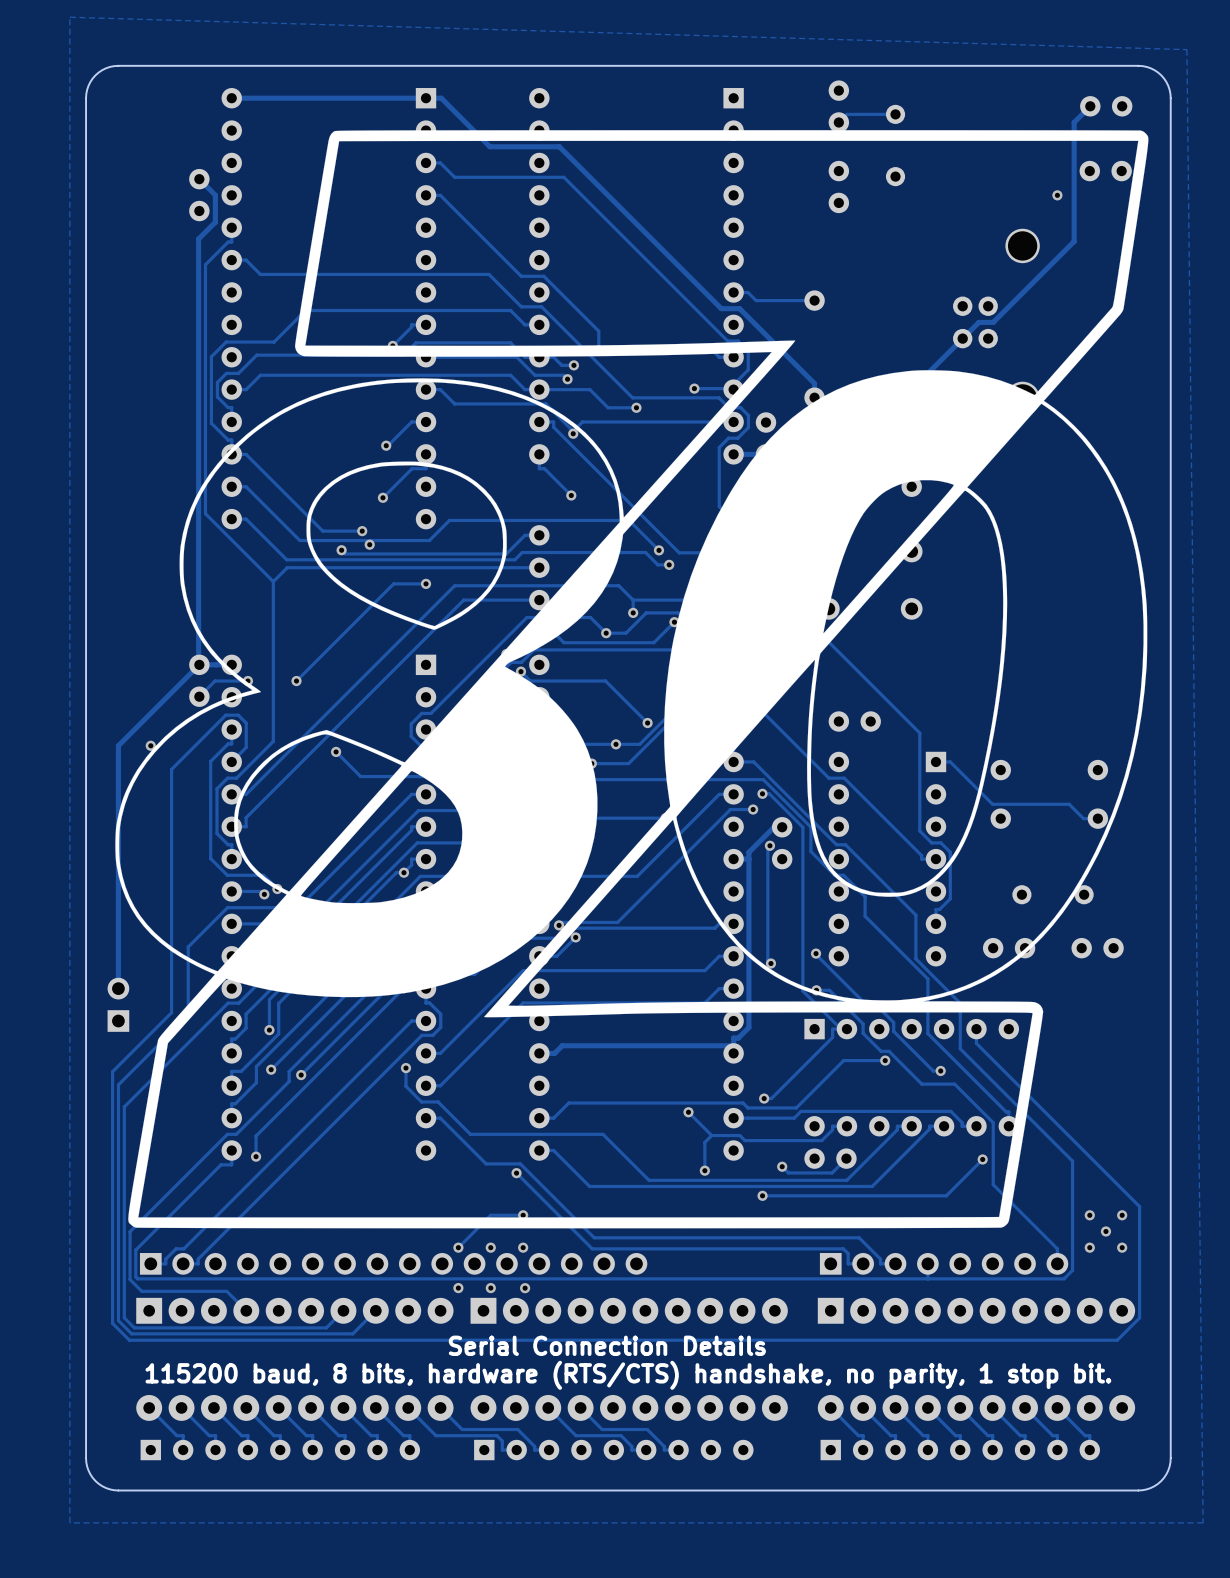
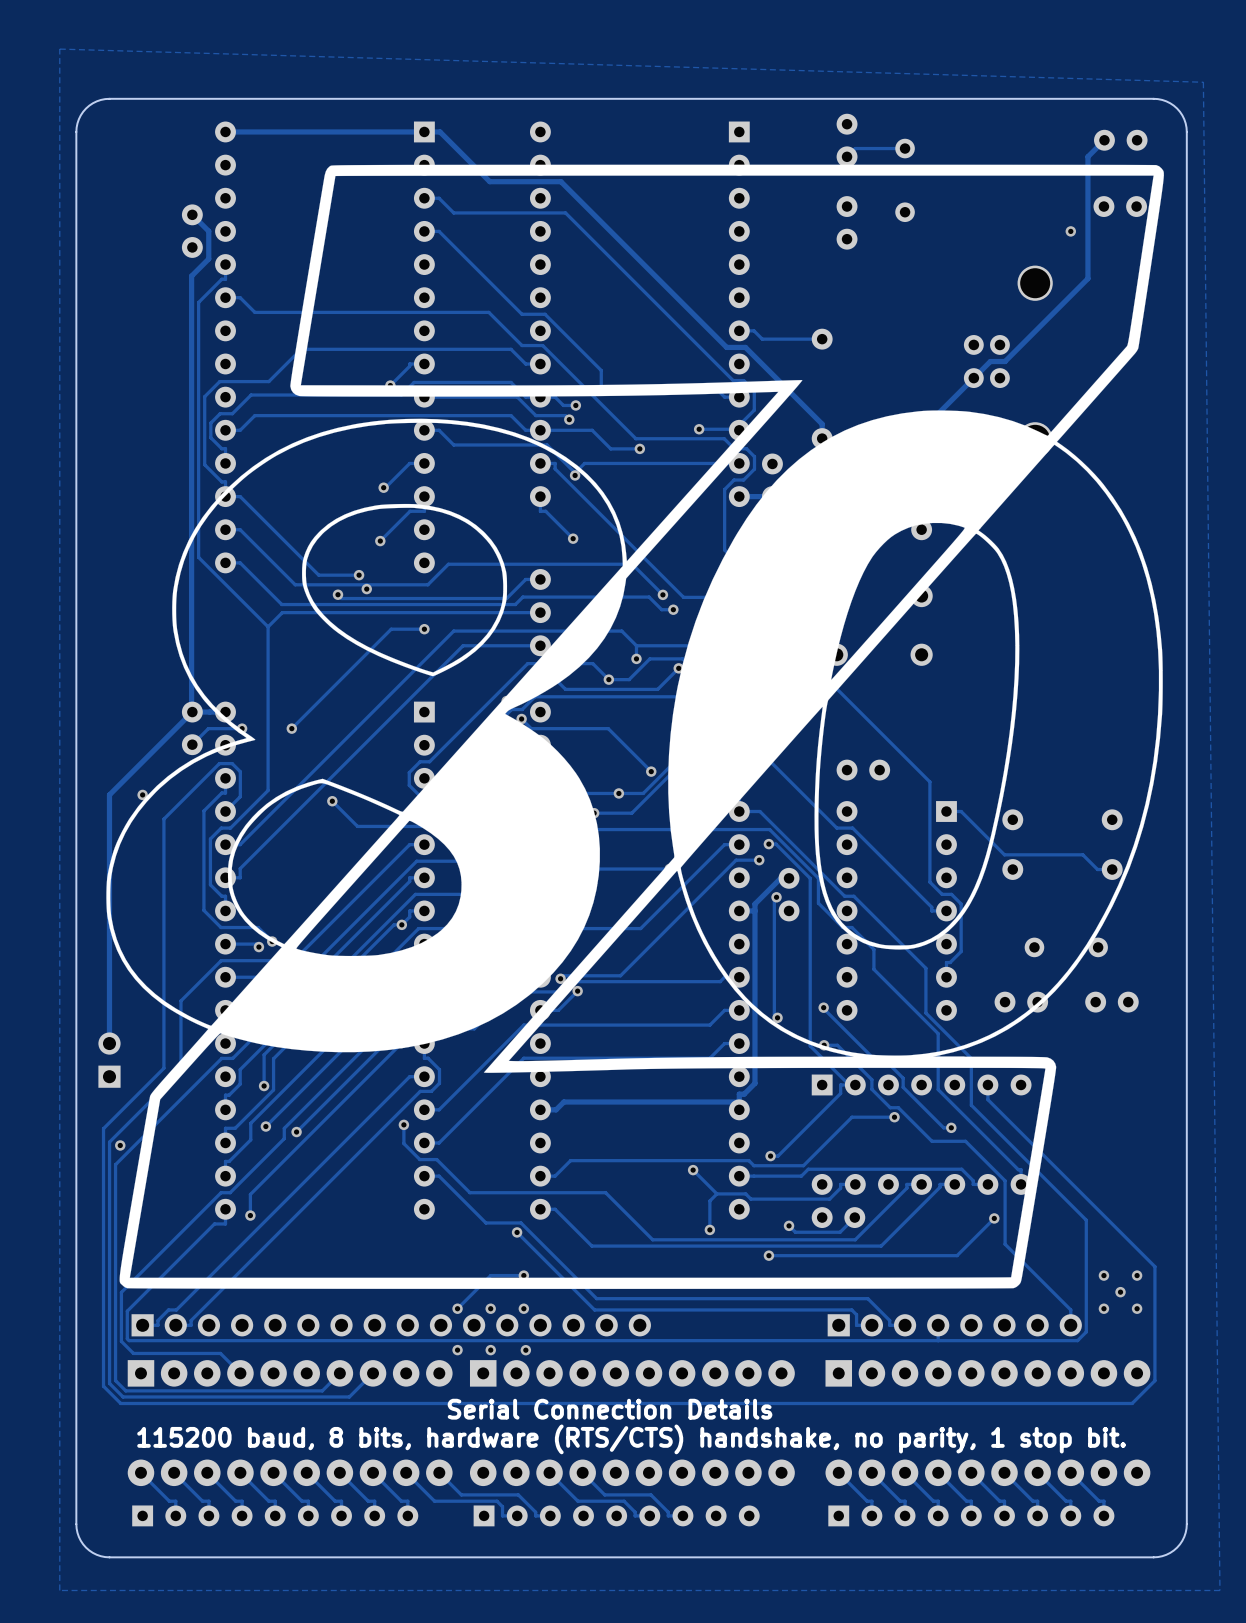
via: none -> (120, 1145)

